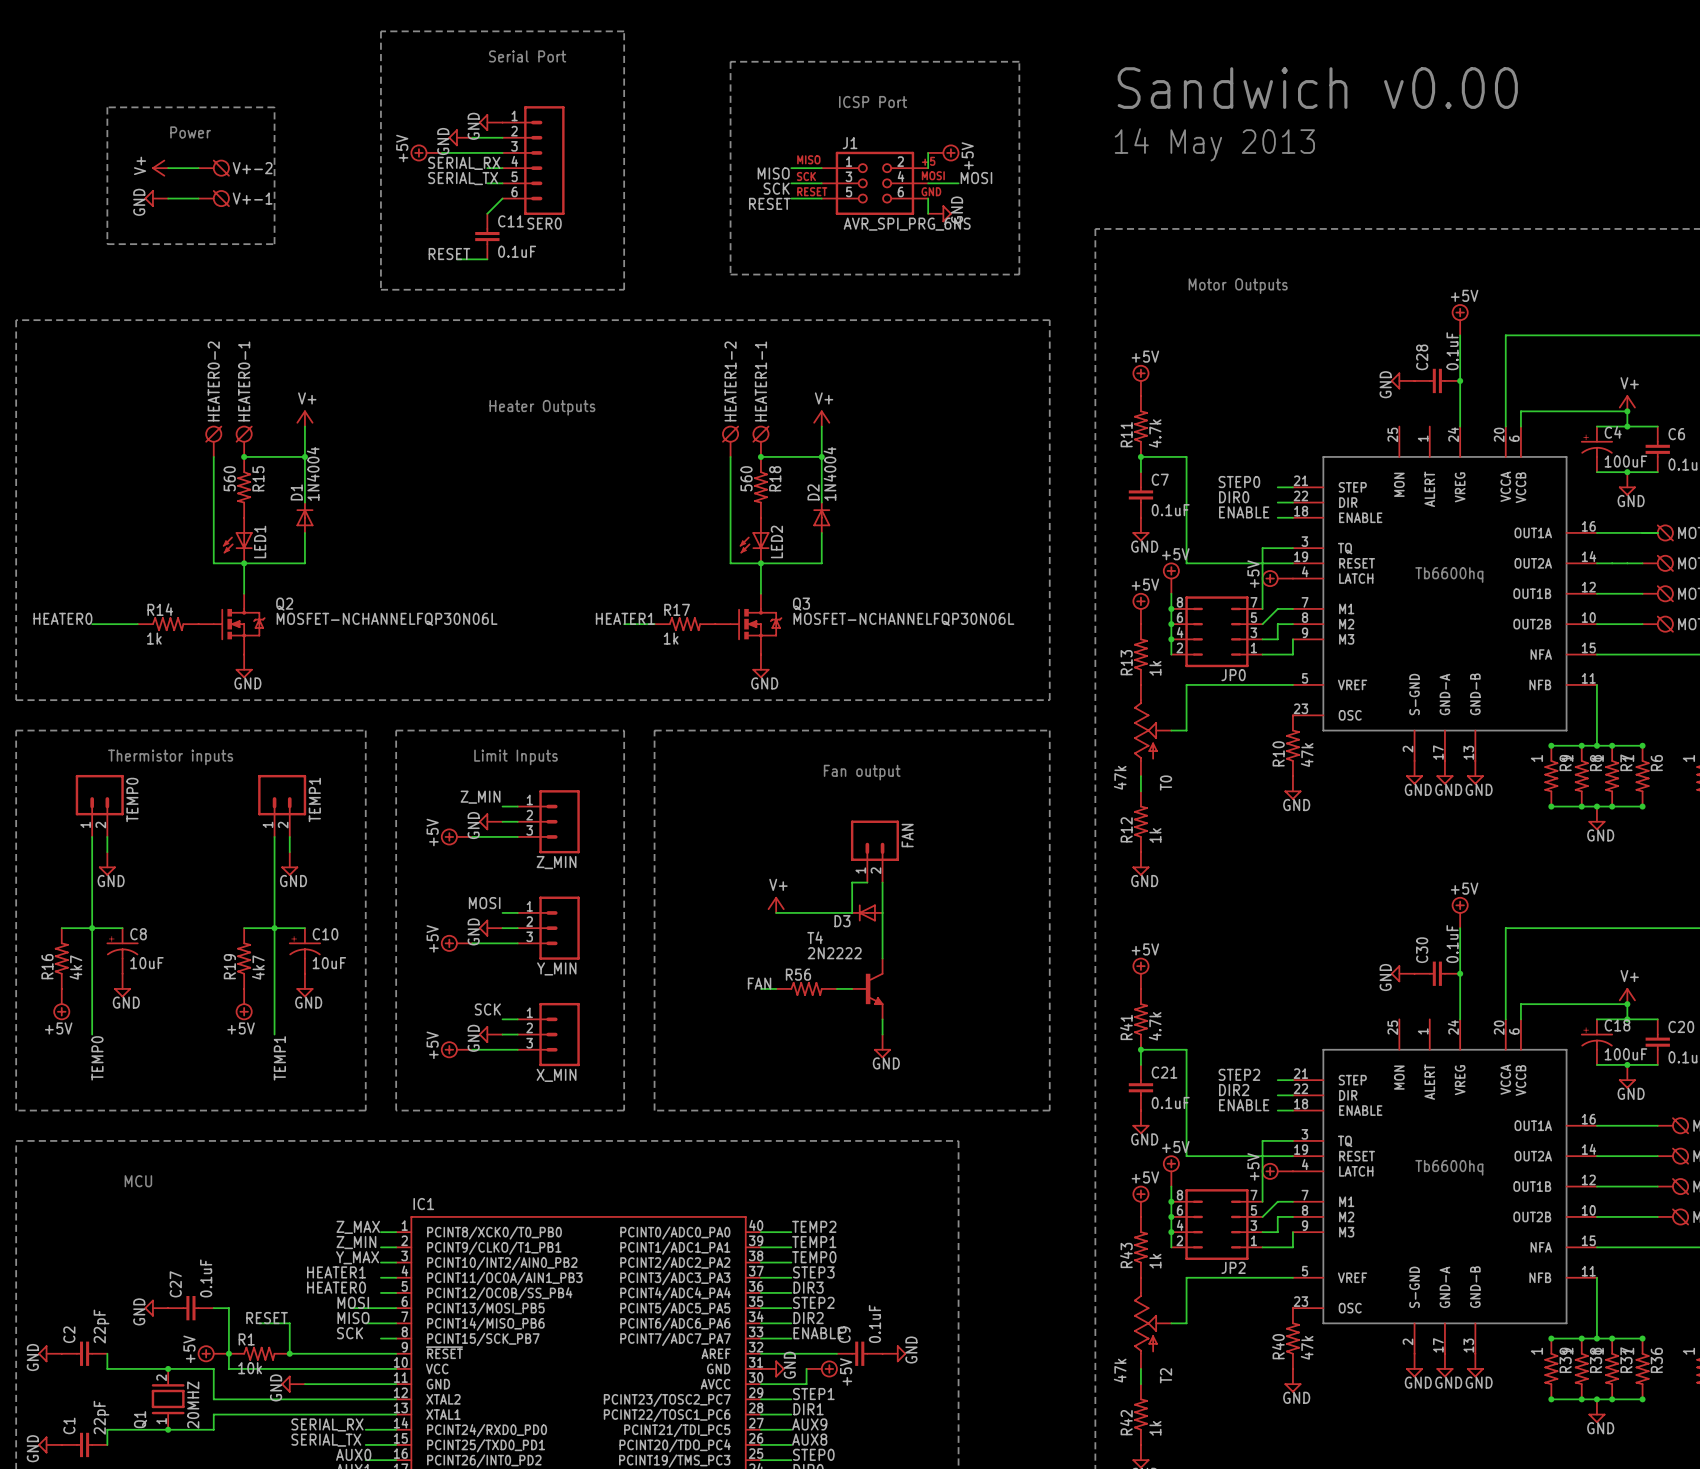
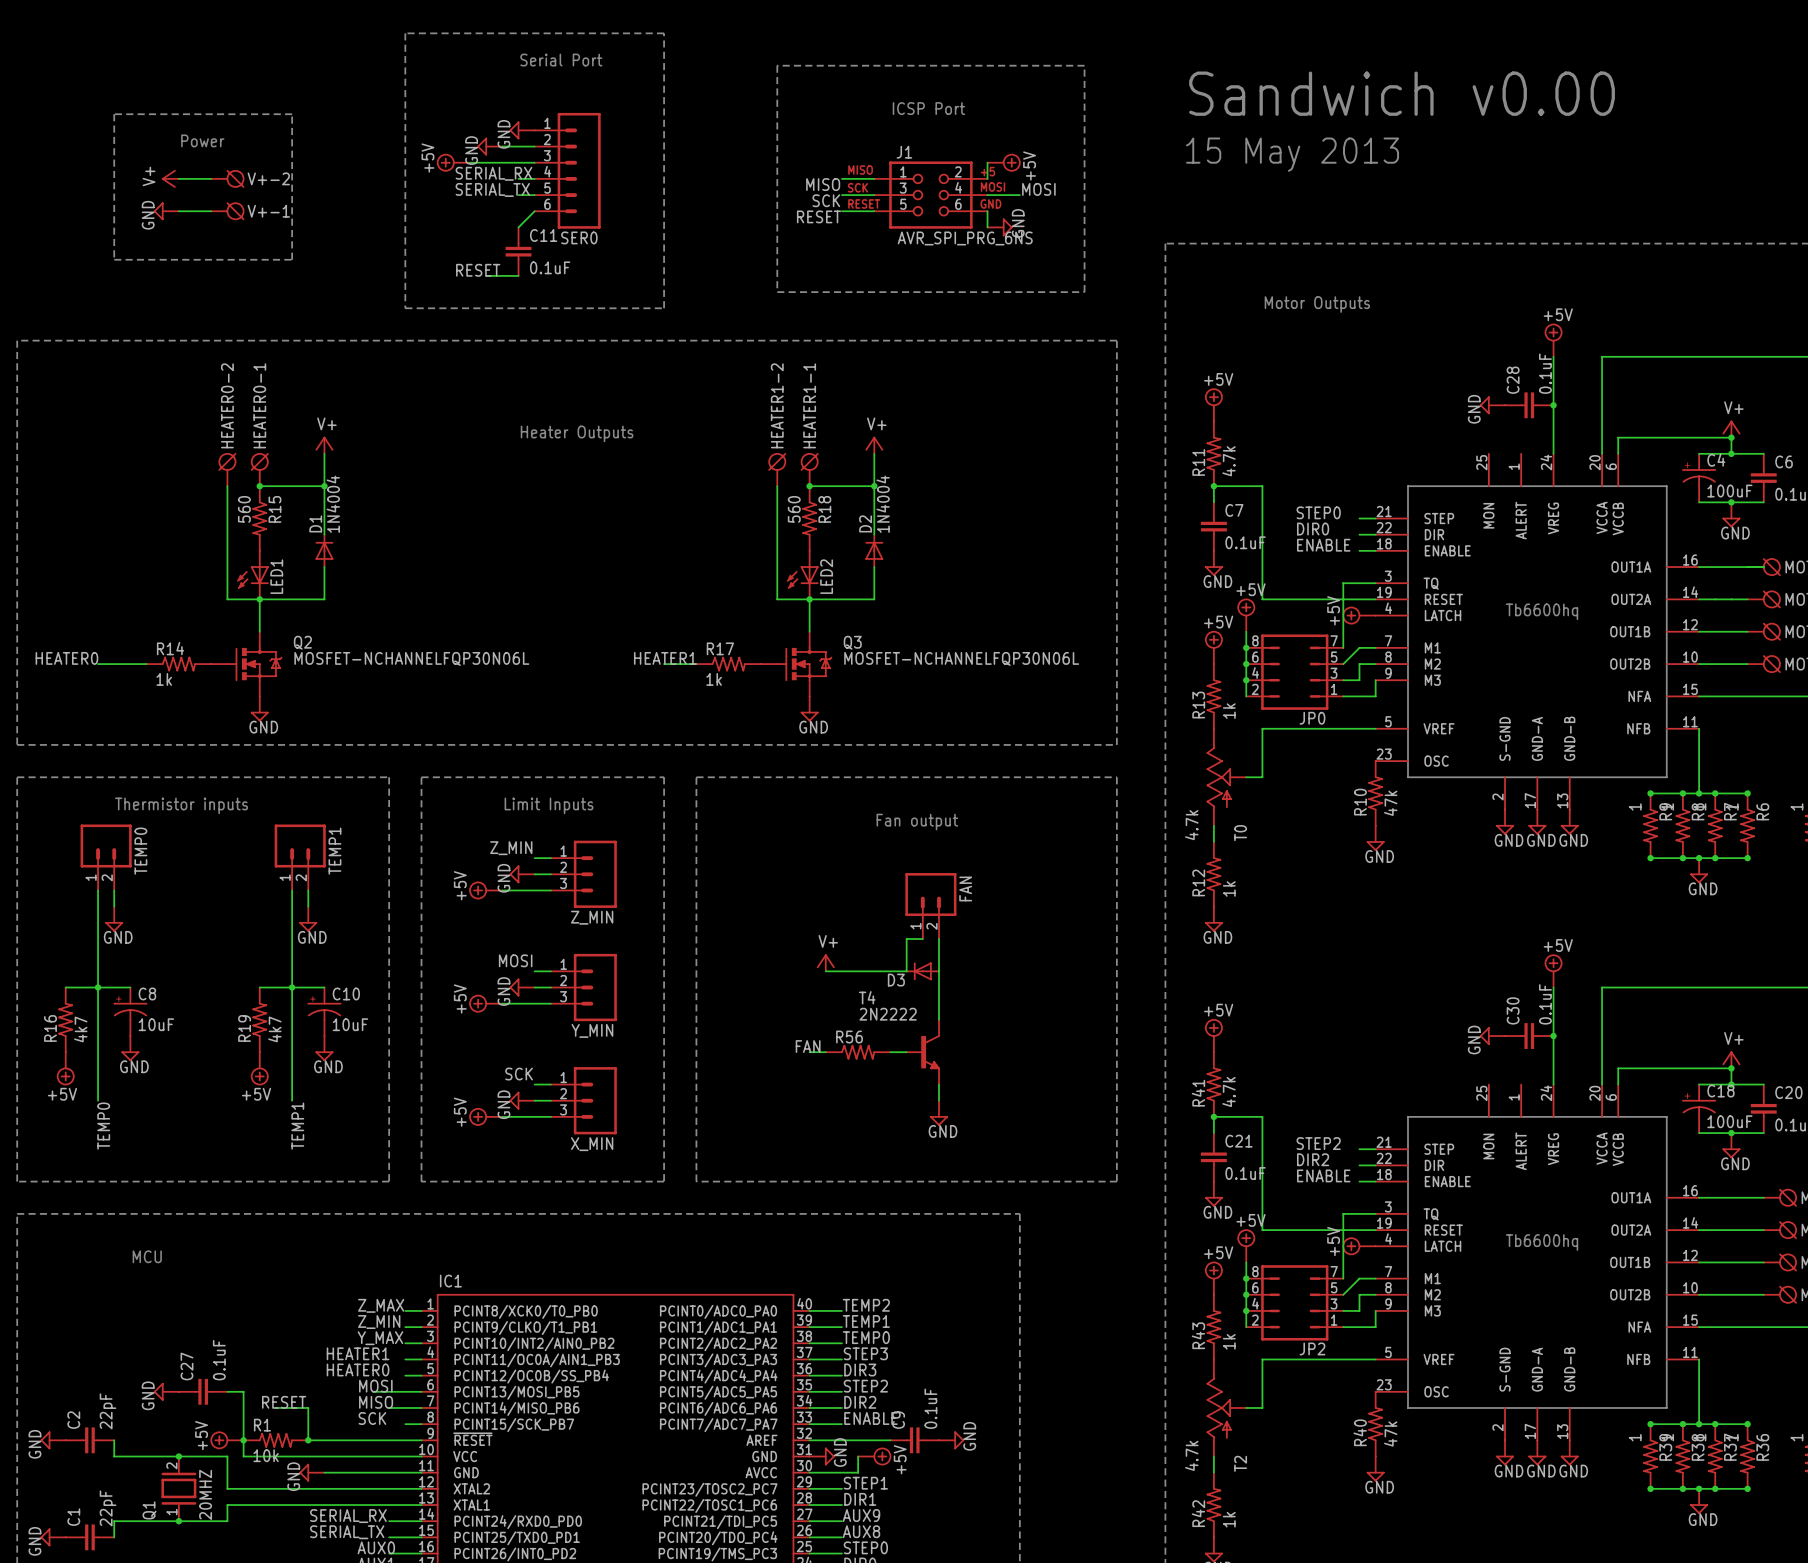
text: 14 May 2013 (1214, 144) -> 15 May 2013 (1292, 154)
T0 value: 47k (1120, 777) -> 4.7k (1191, 825)
T2 value: 47k (1120, 1370) -> 4.7k (1191, 1455)

